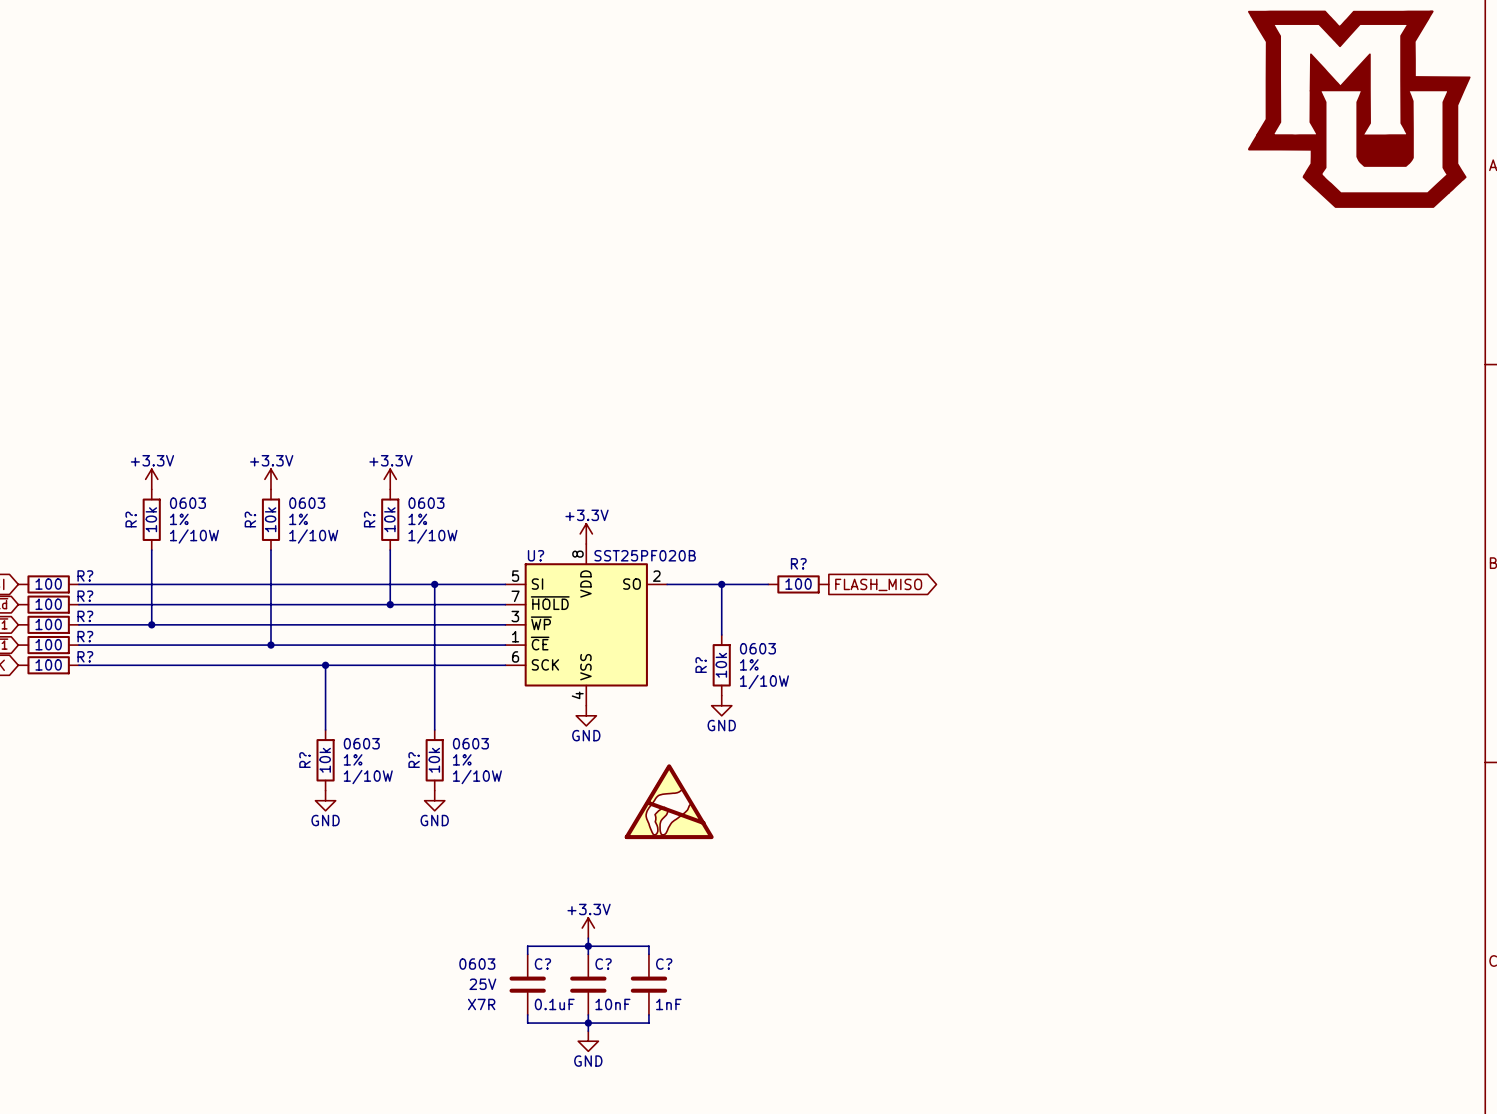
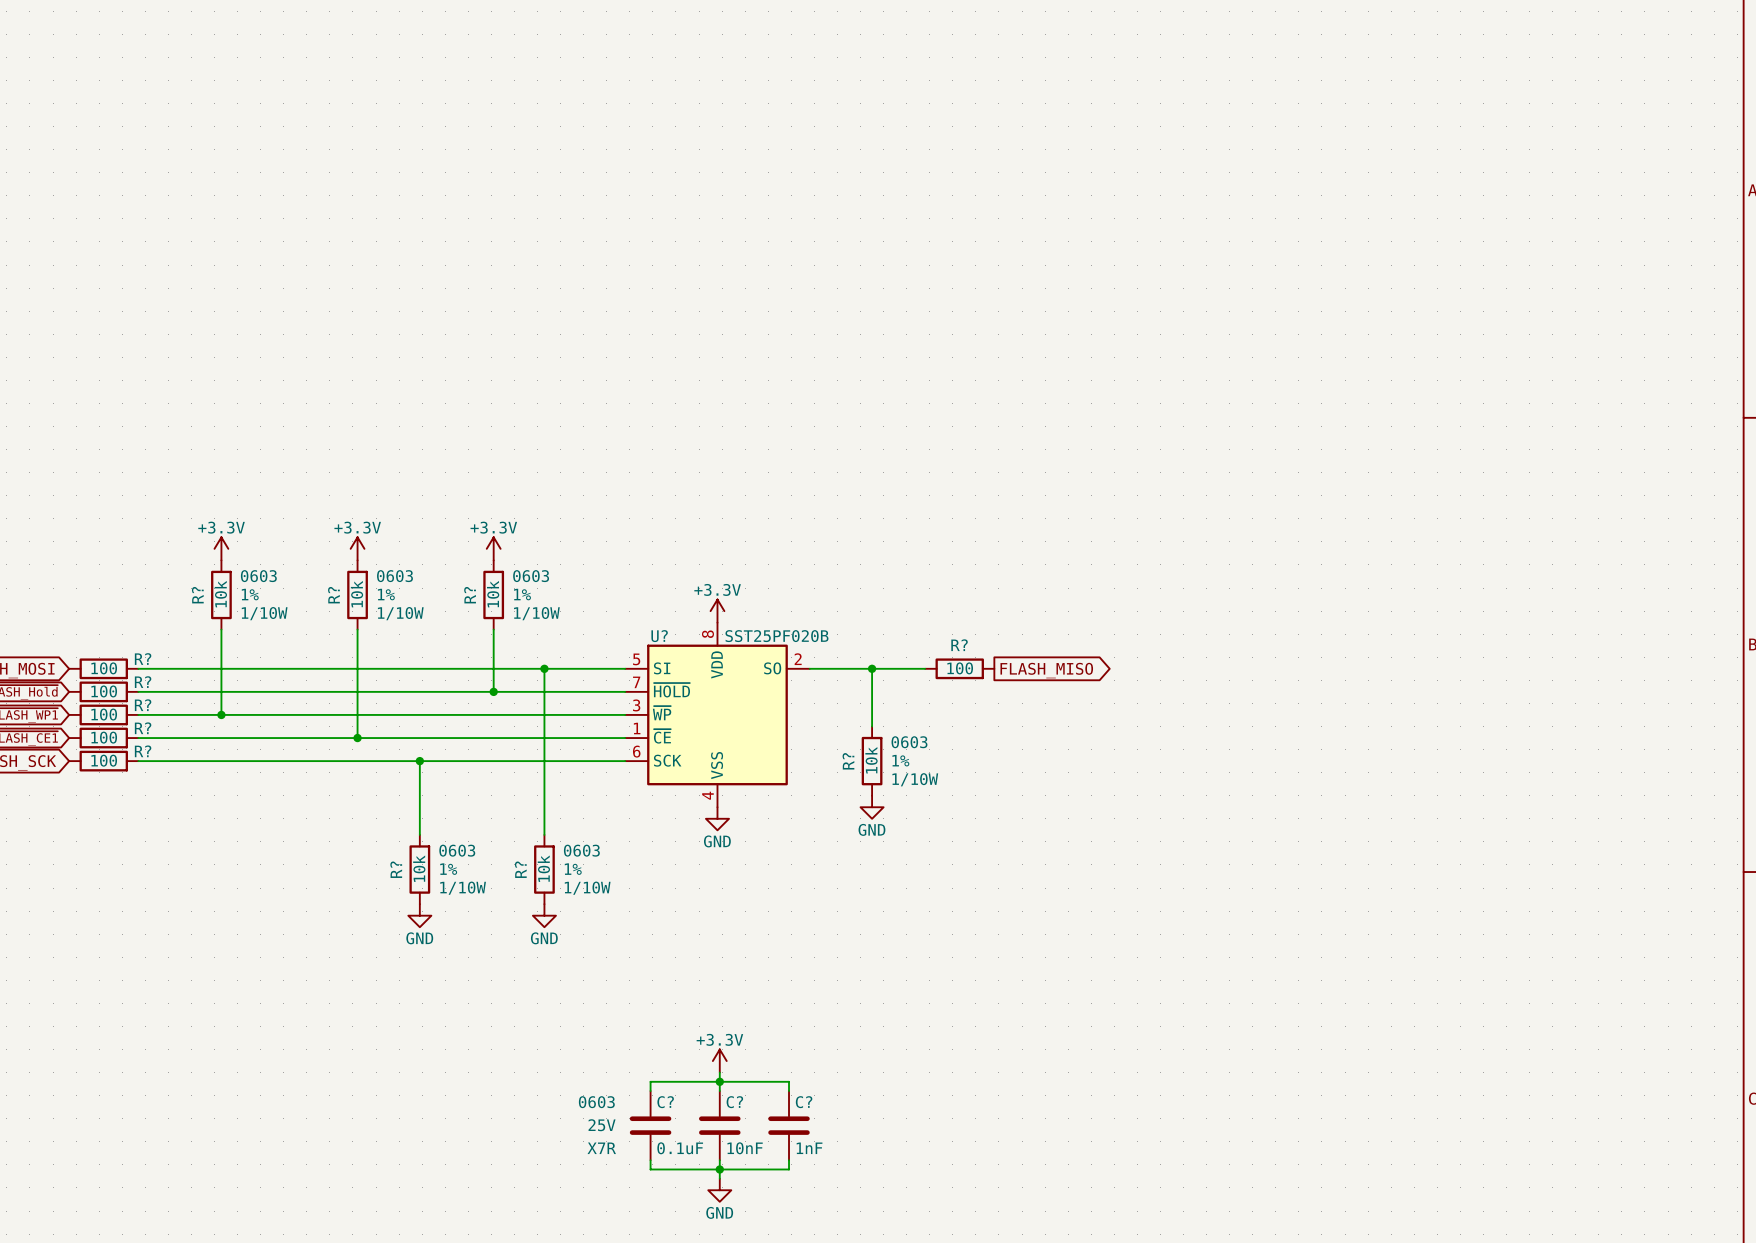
power symbol: (1359, 109) -> none
power symbol: (669, 801) -> none

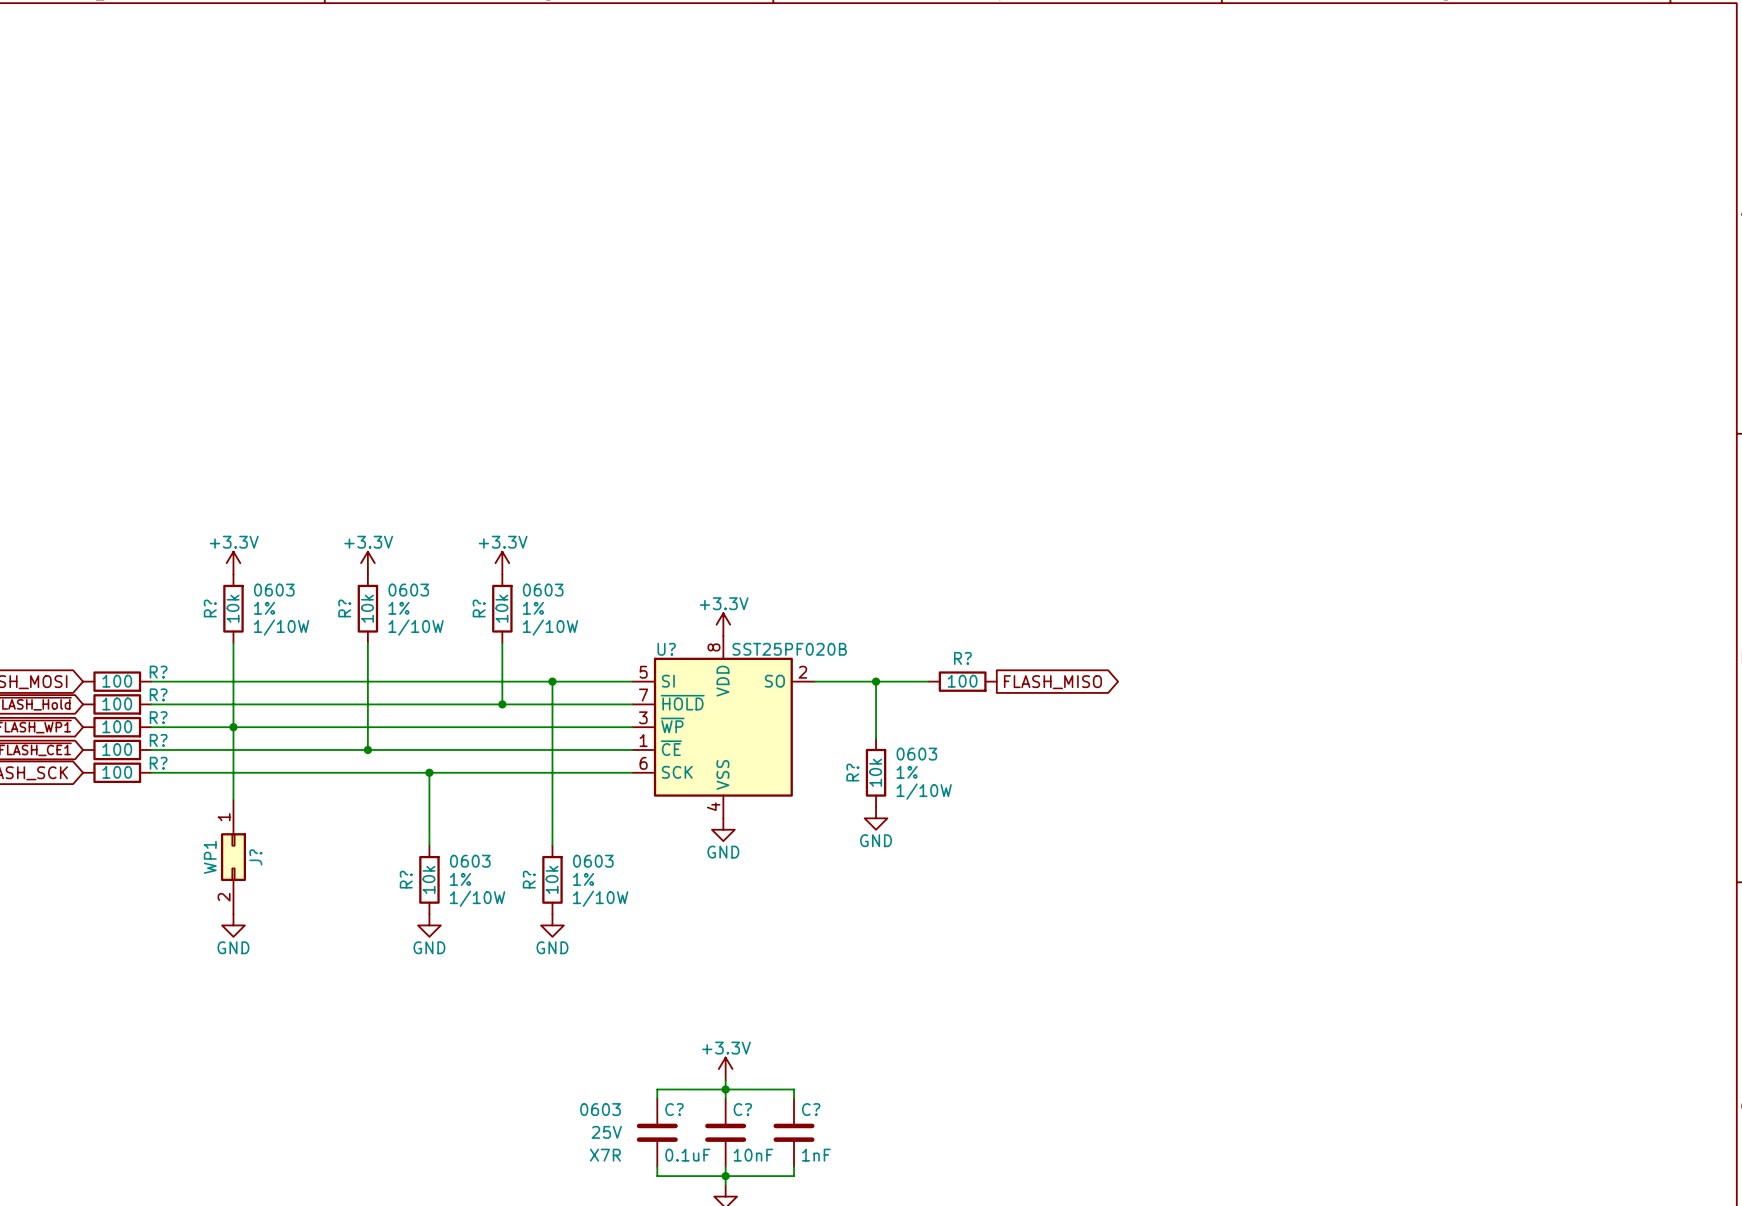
wire: none -> (233, 727) (233, 800)
J?: none -> WP1 (233, 857)
power symbol: none -> GND (233, 925)

